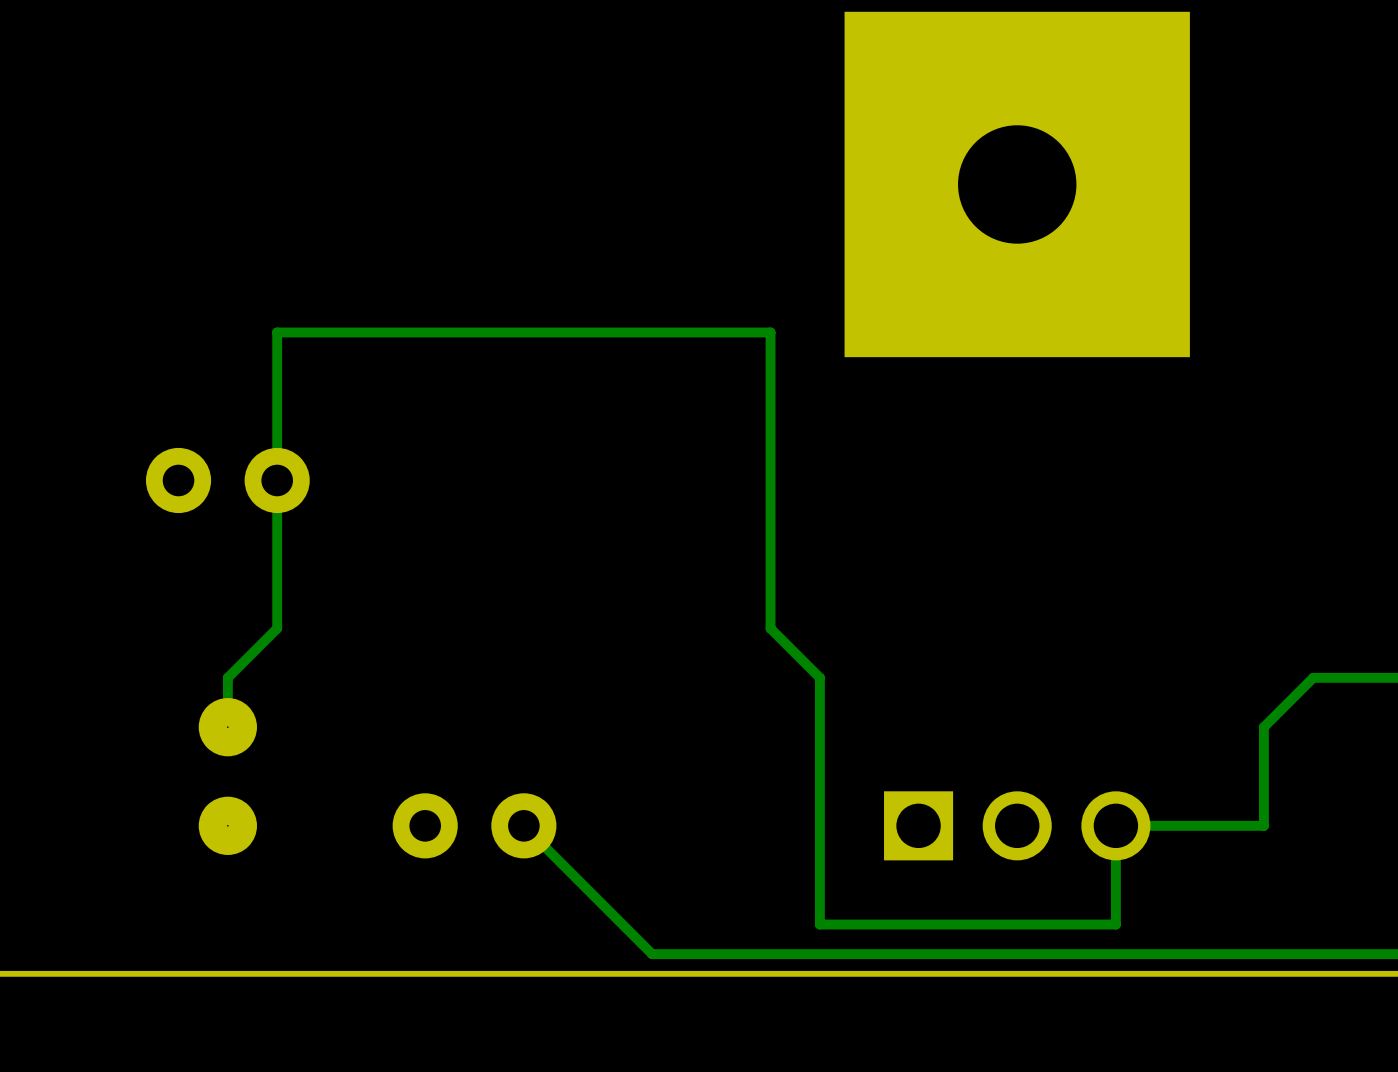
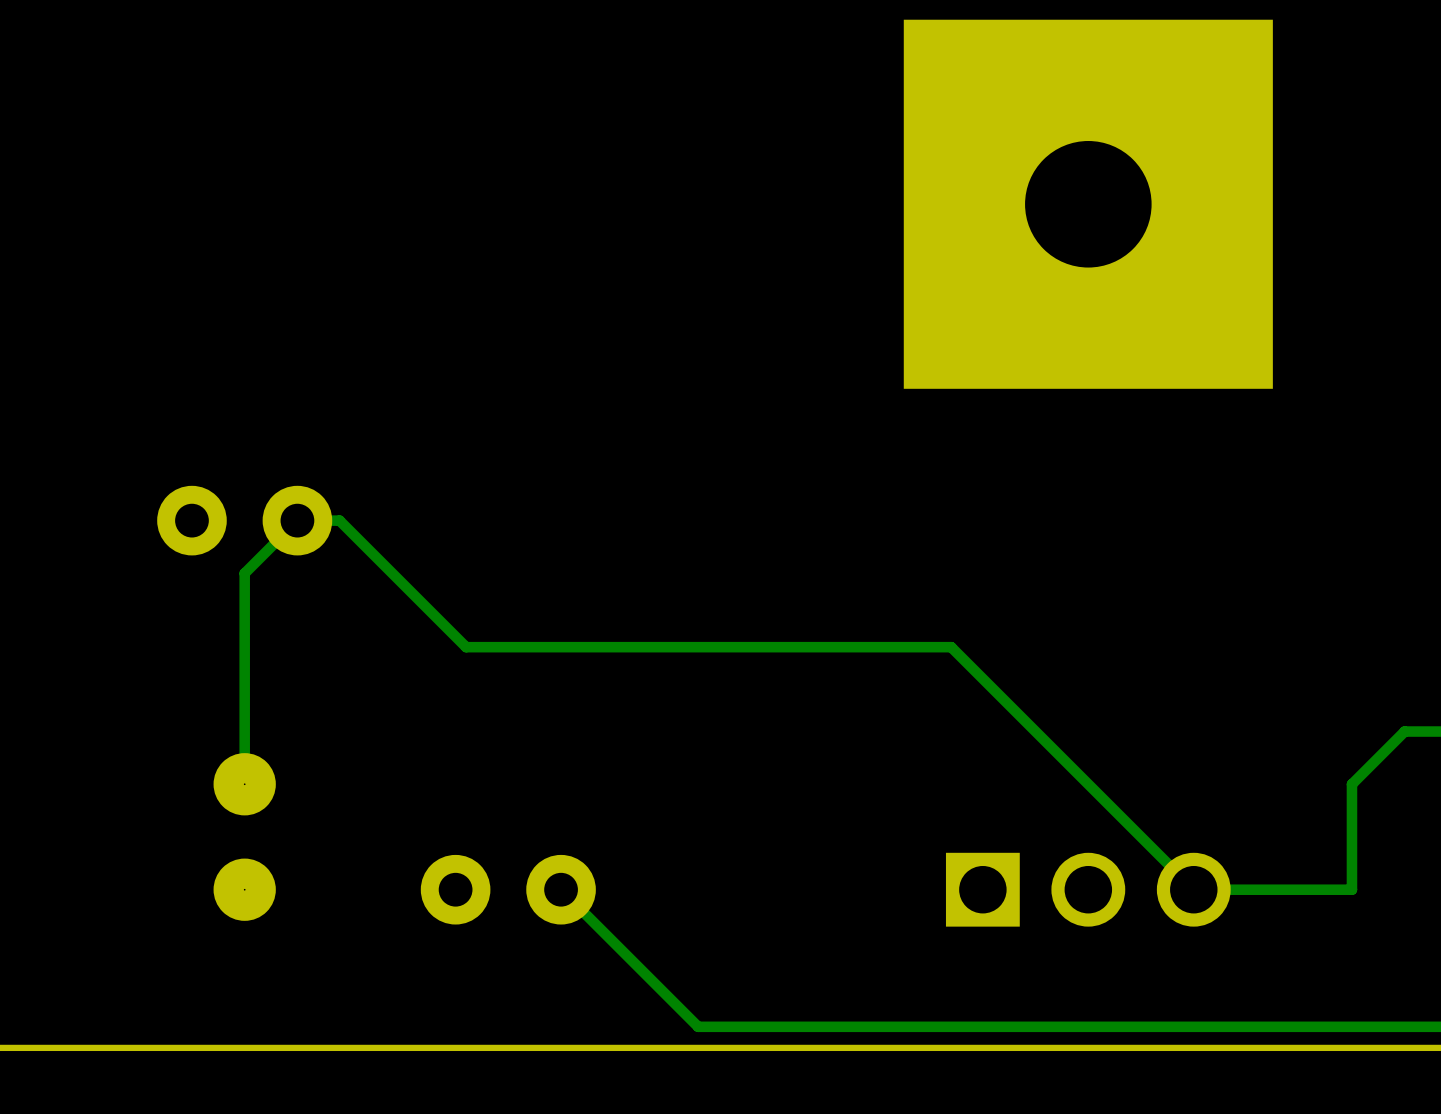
track: (227, 677) (277, 628) (277, 332) (770, 332) (770, 628) (819, 677) (819, 924) (1115, 924) (1115, 825) -> (244, 731) (244, 573) (297, 520) (339, 520) (466, 647) (951, 647) (1193, 889)

